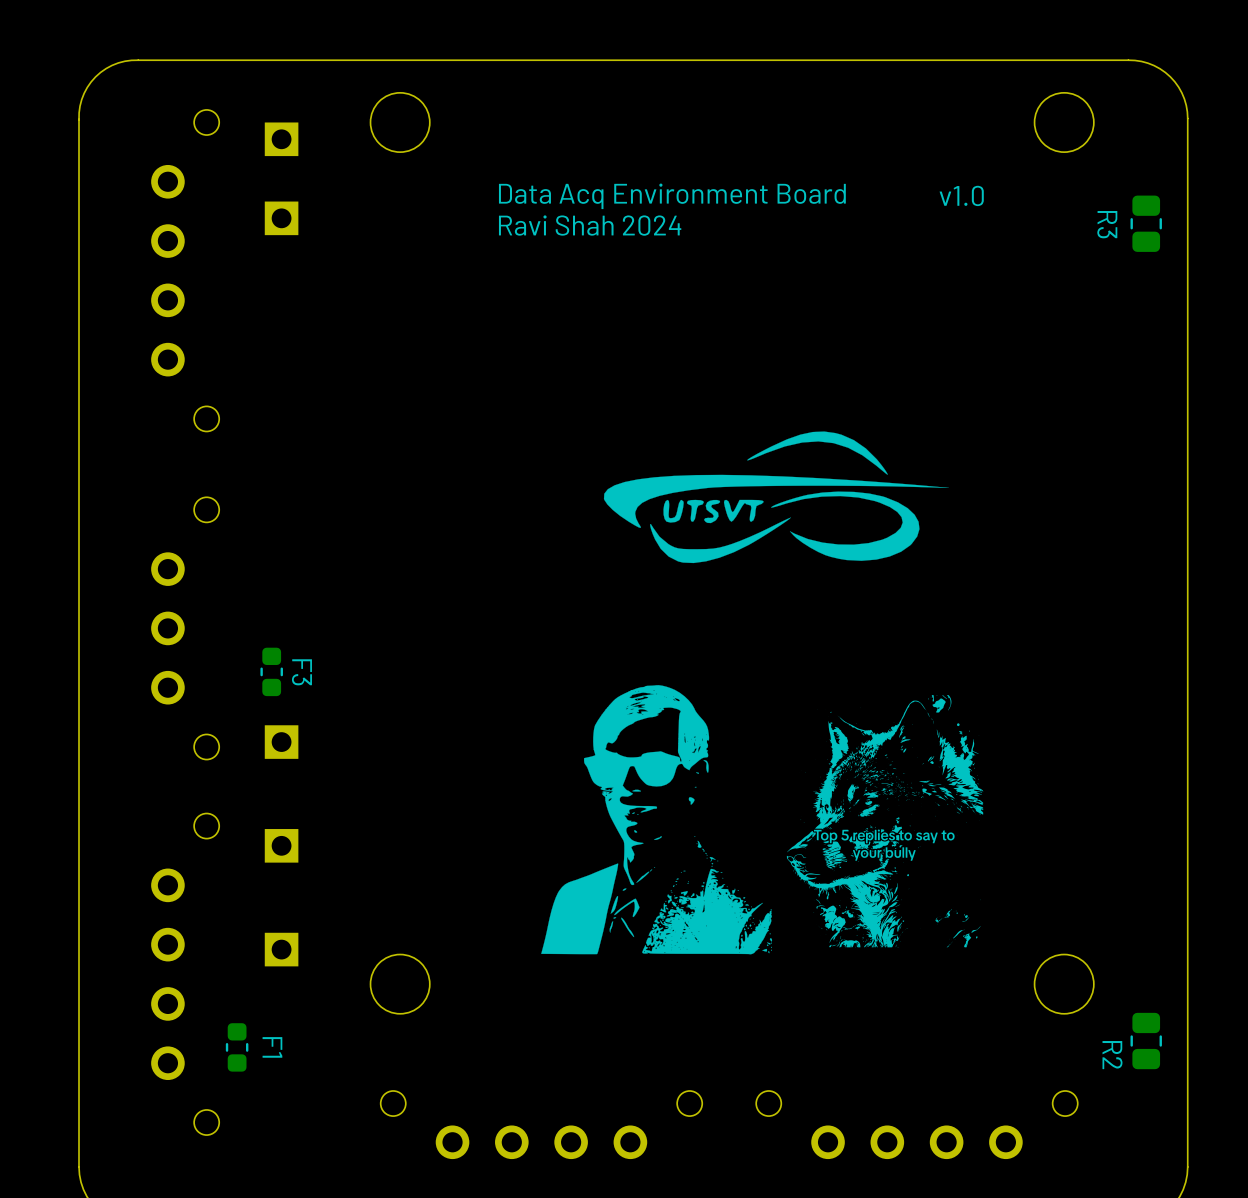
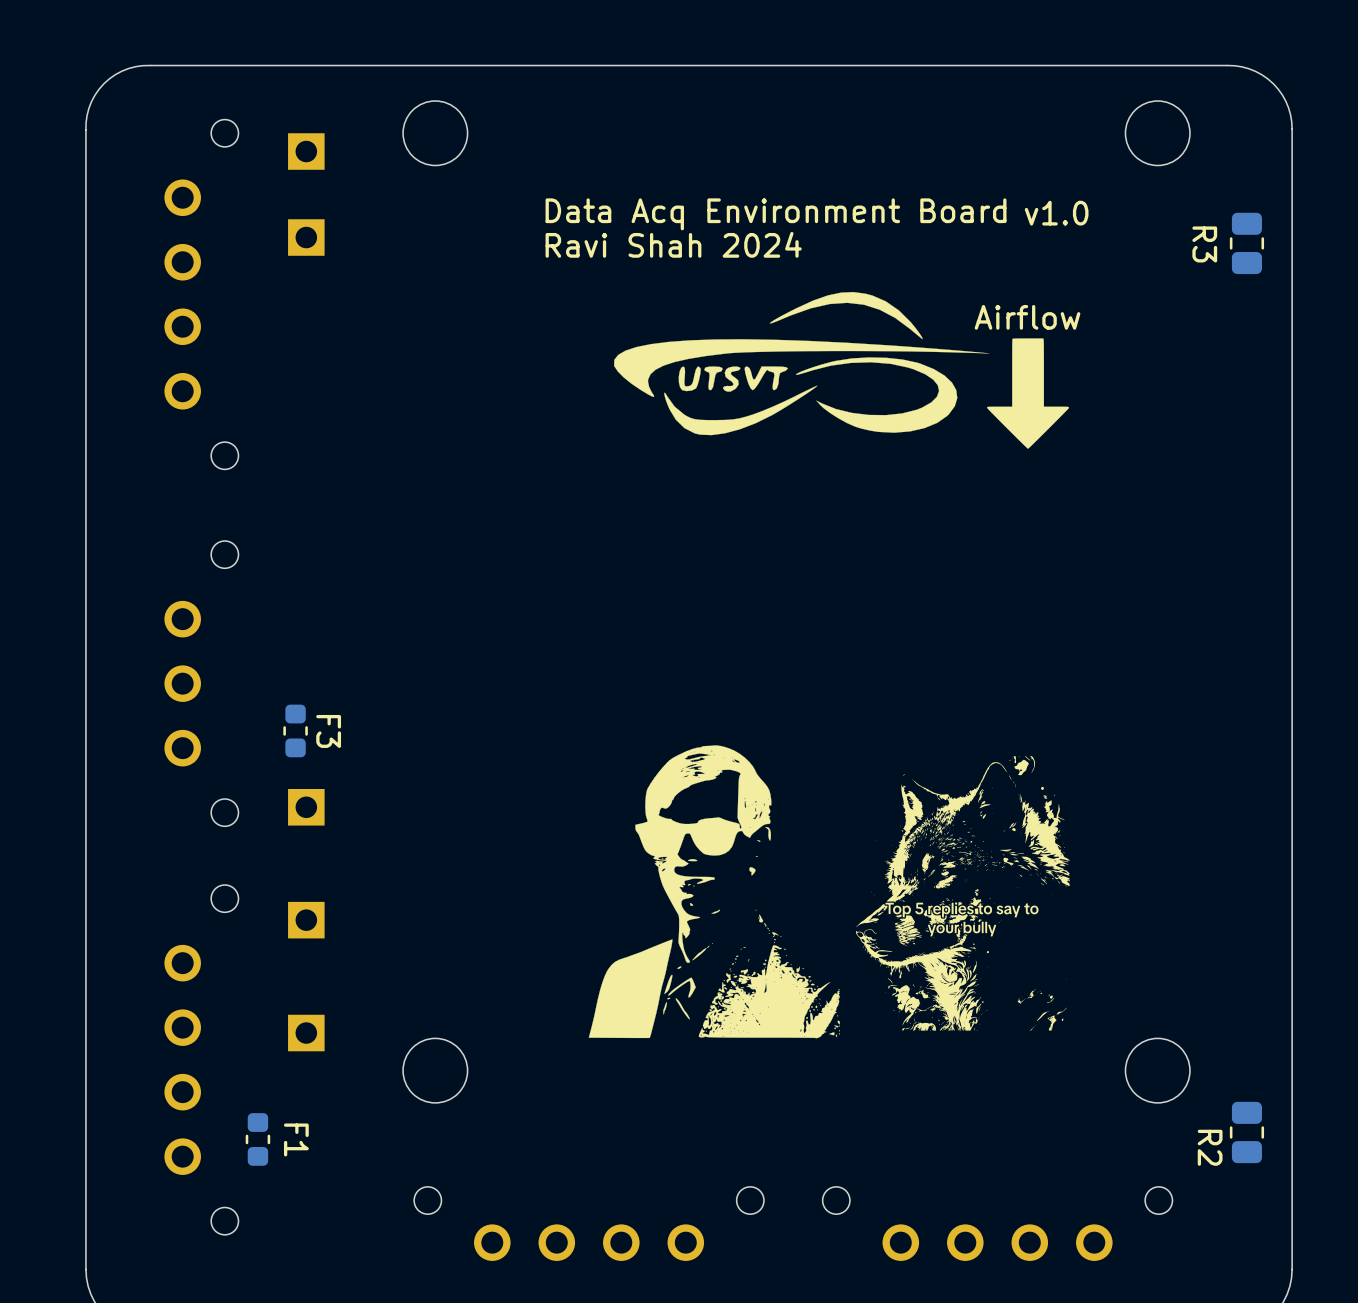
text: none -> Airflow (1027, 317)
drawing: none -> [986, 338, 1070, 449]
drawing position: (776, 497) -> (801, 363)

